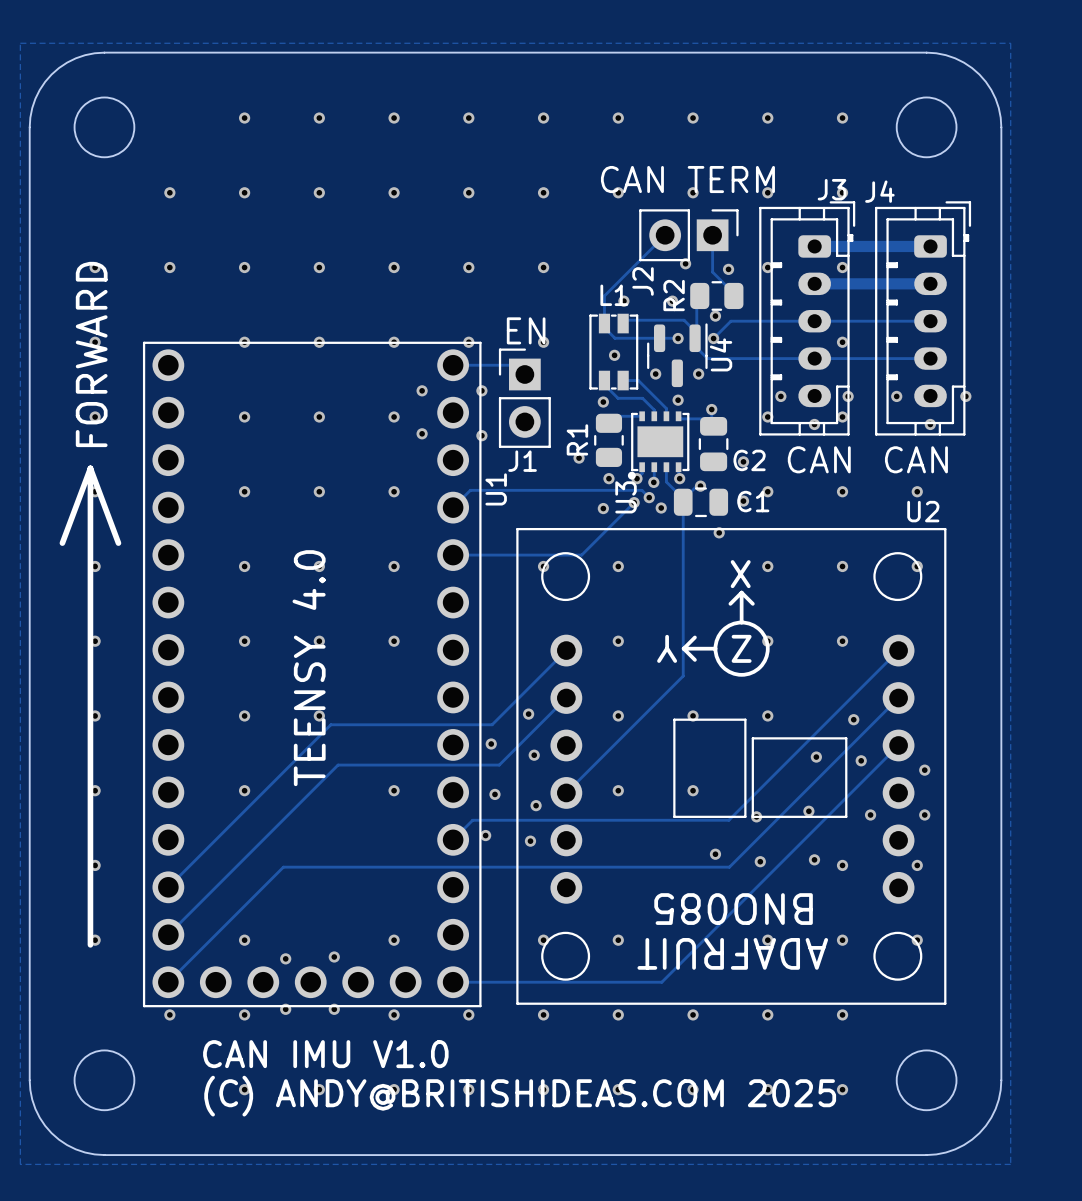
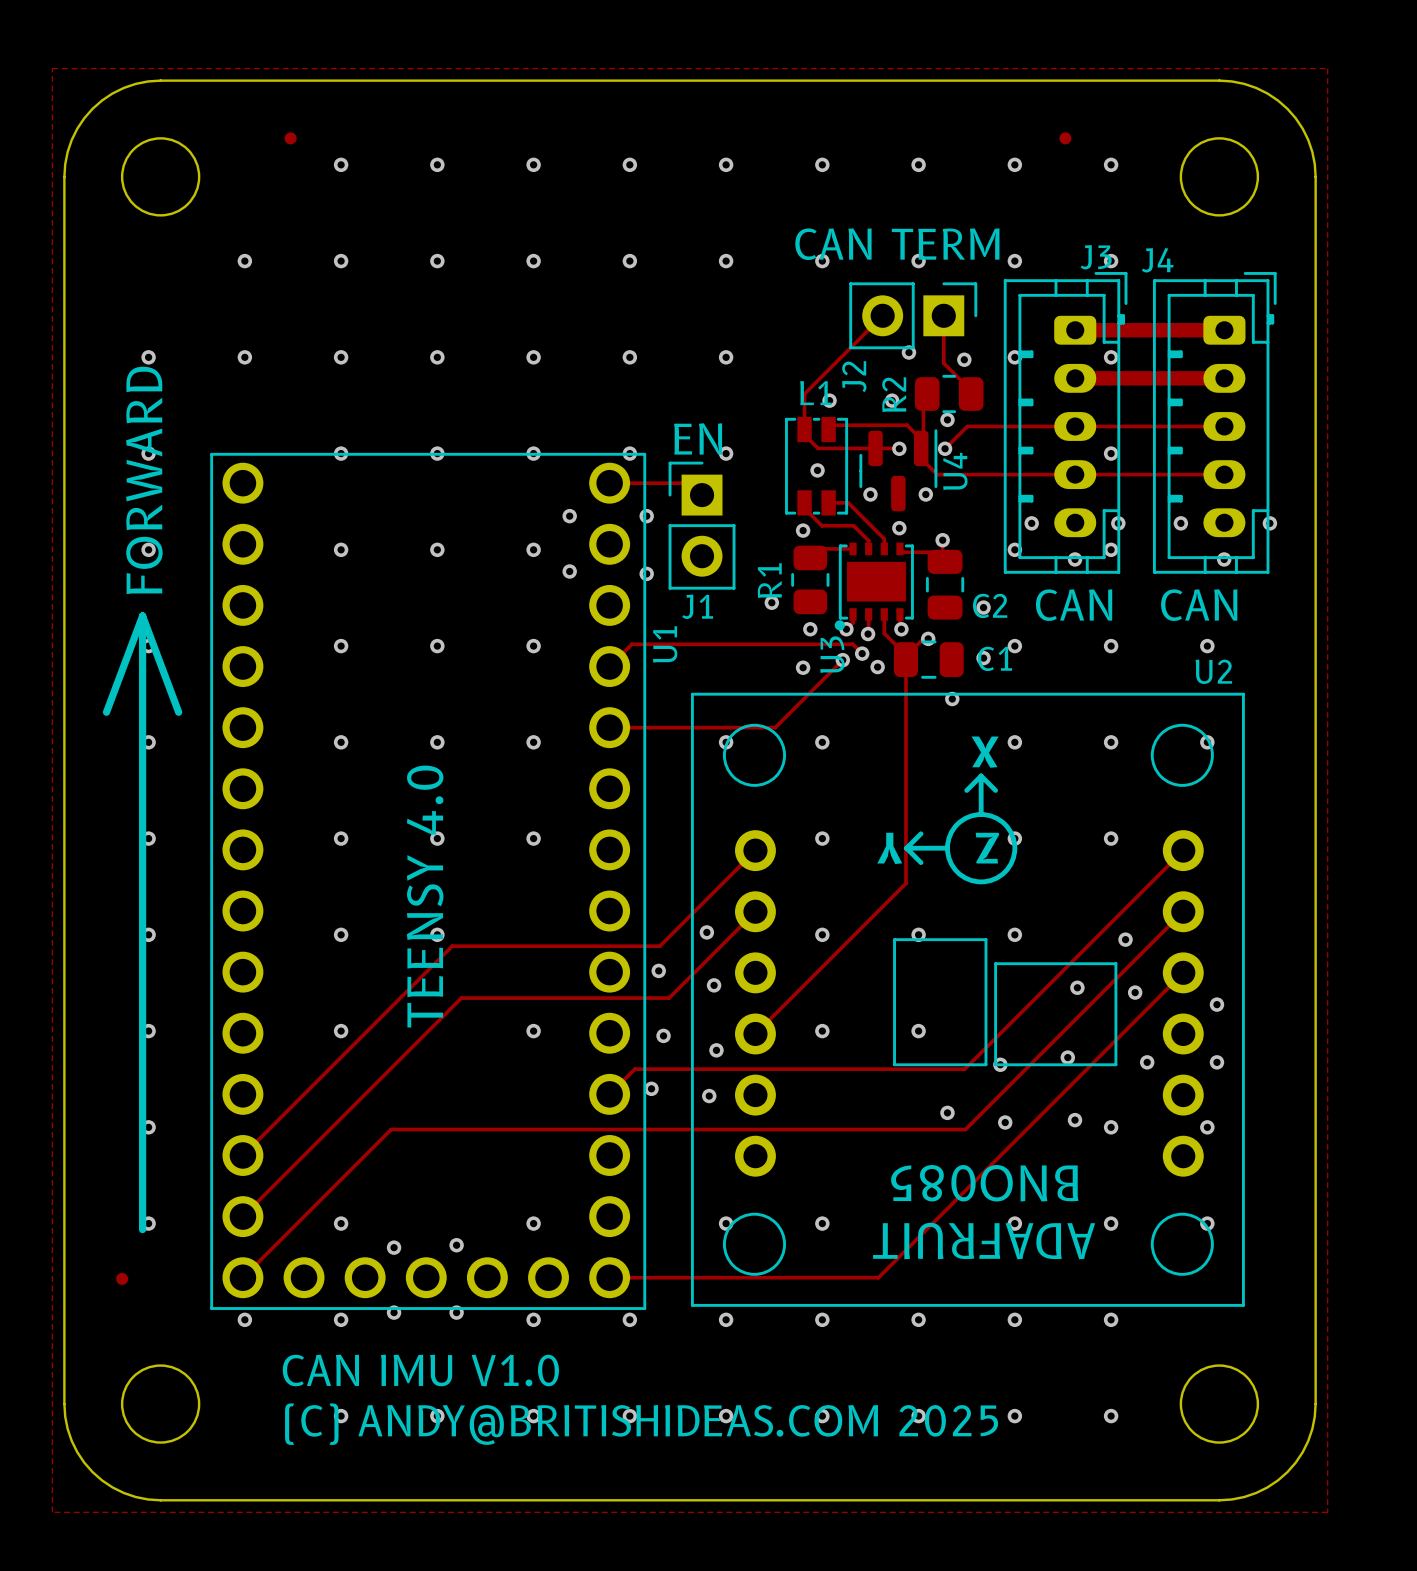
part: none -> (290, 138)
part: none -> (1065, 138)
part: none -> (122, 1278)

